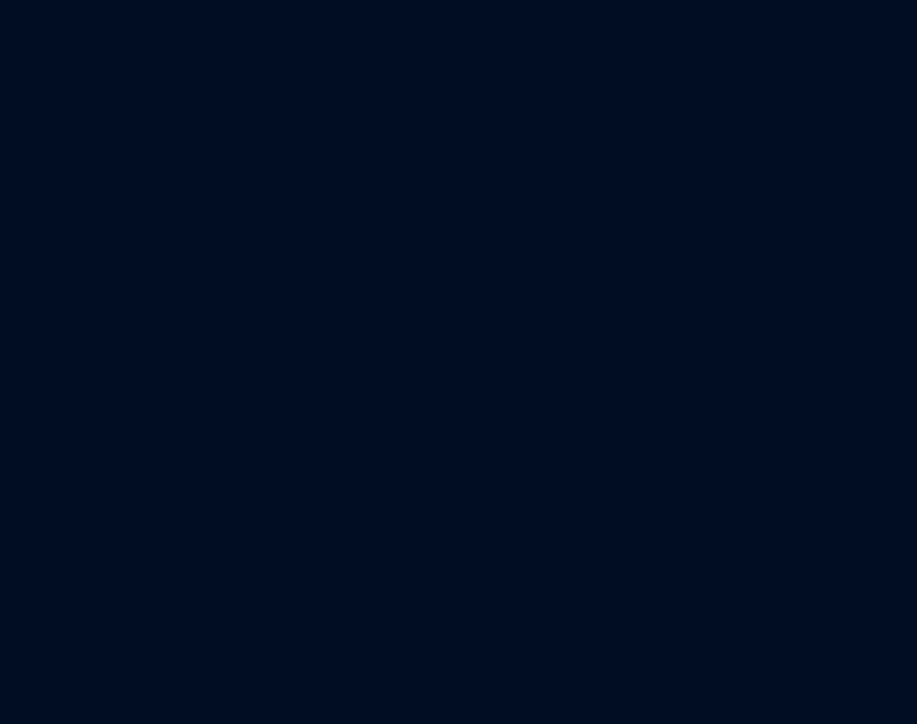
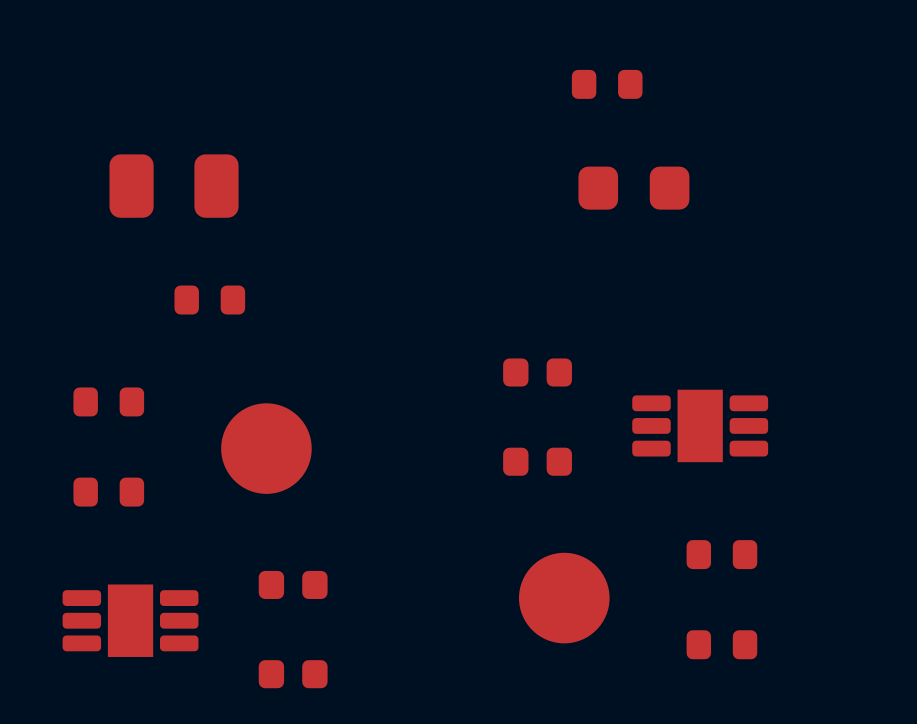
part: none -> (607, 84)
part: none -> (174, 186)
part: none -> (633, 188)
part: none -> (209, 300)
part: none -> (537, 372)
part: none -> (108, 401)
part: none -> (700, 425)
part: none -> (266, 448)
part: none -> (537, 461)
part: none -> (108, 492)
part: none -> (721, 554)
part: none -> (293, 584)
part: none -> (564, 598)
part: none -> (130, 620)
part: none -> (721, 644)
part: none -> (293, 674)

